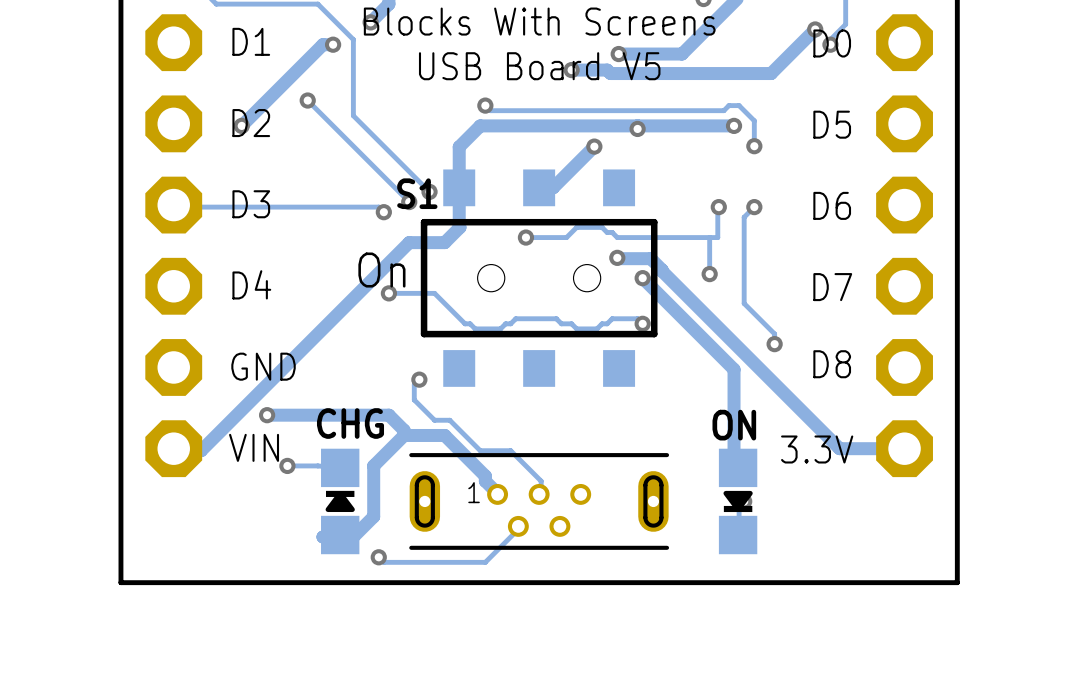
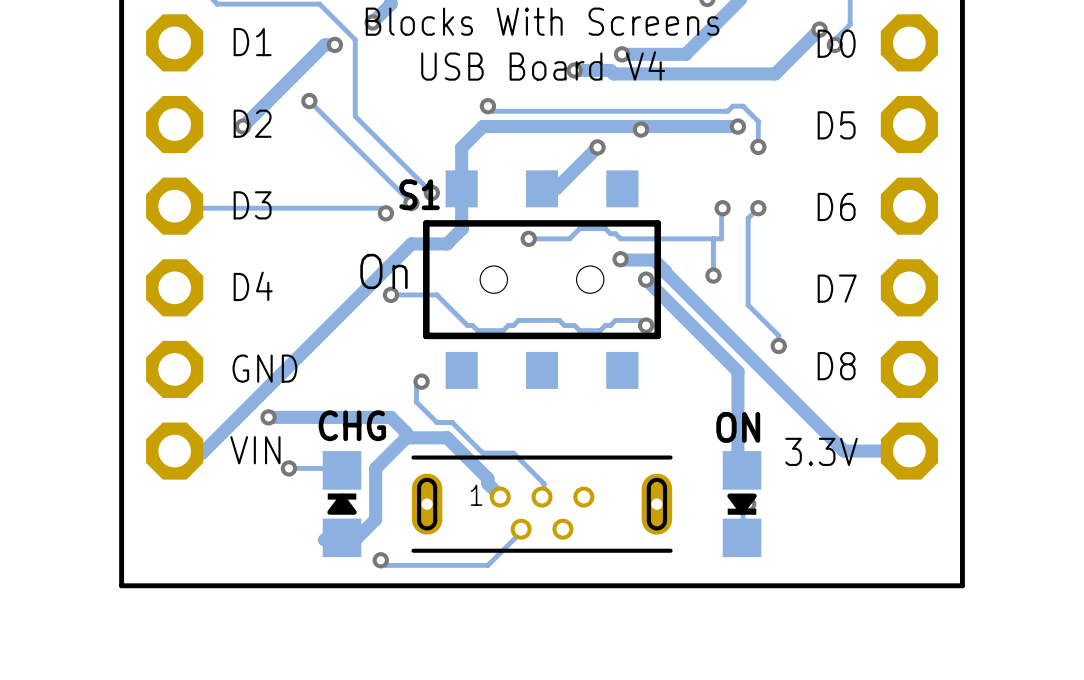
text: USB Board V5 (539, 66) -> USB Board V4 (543, 65)

